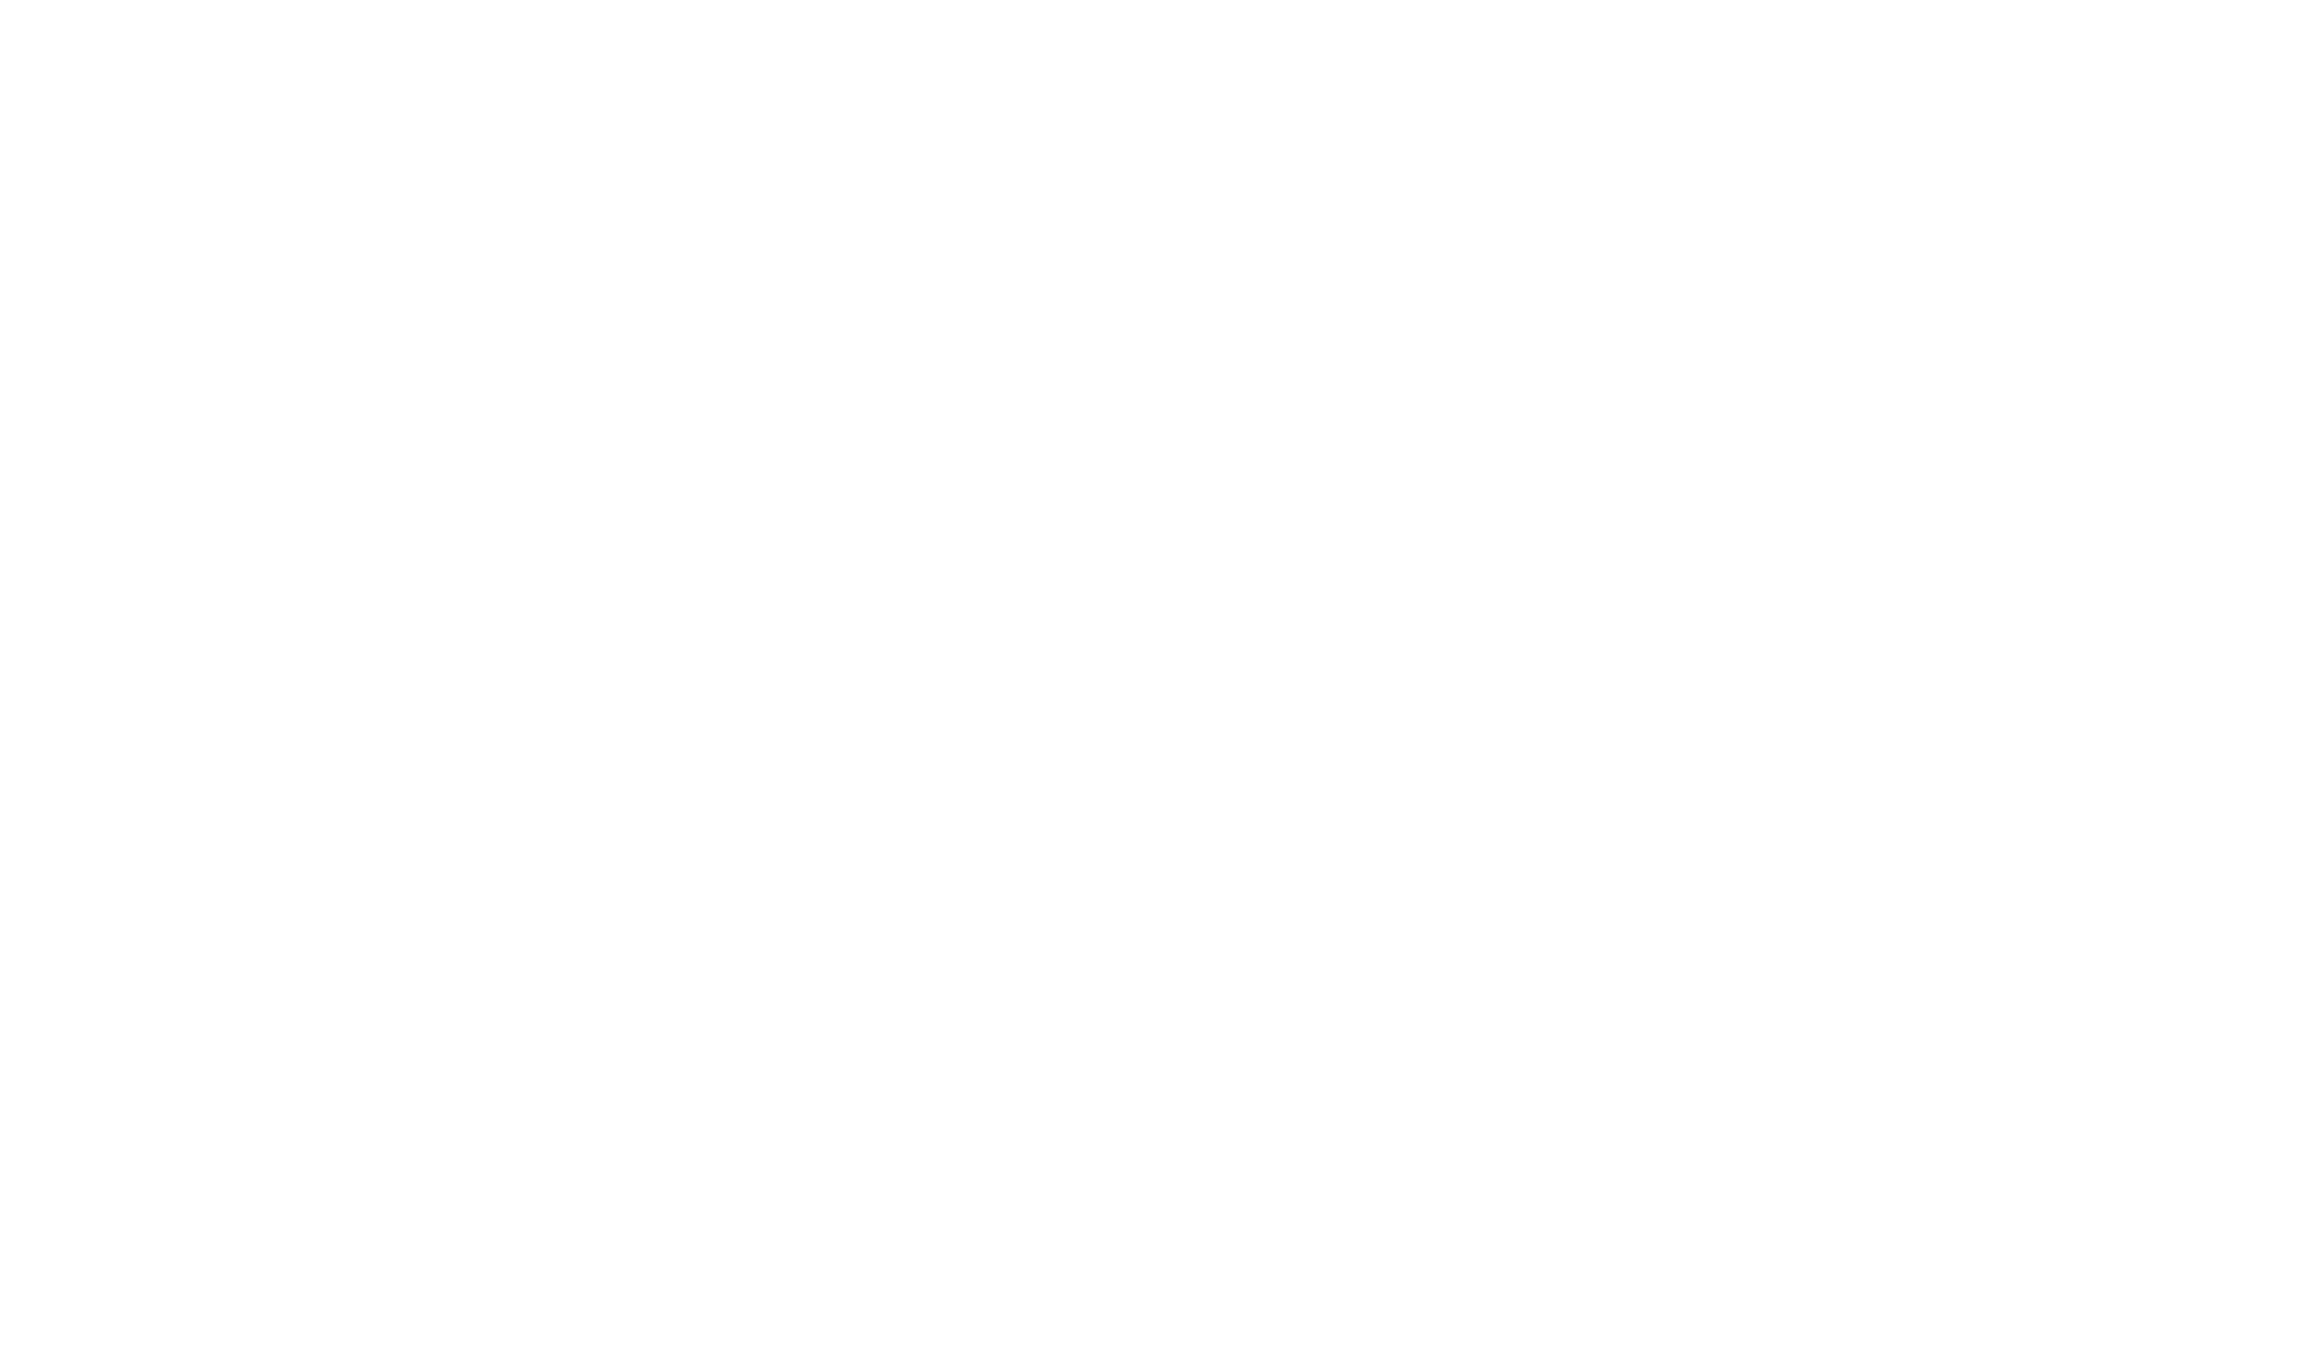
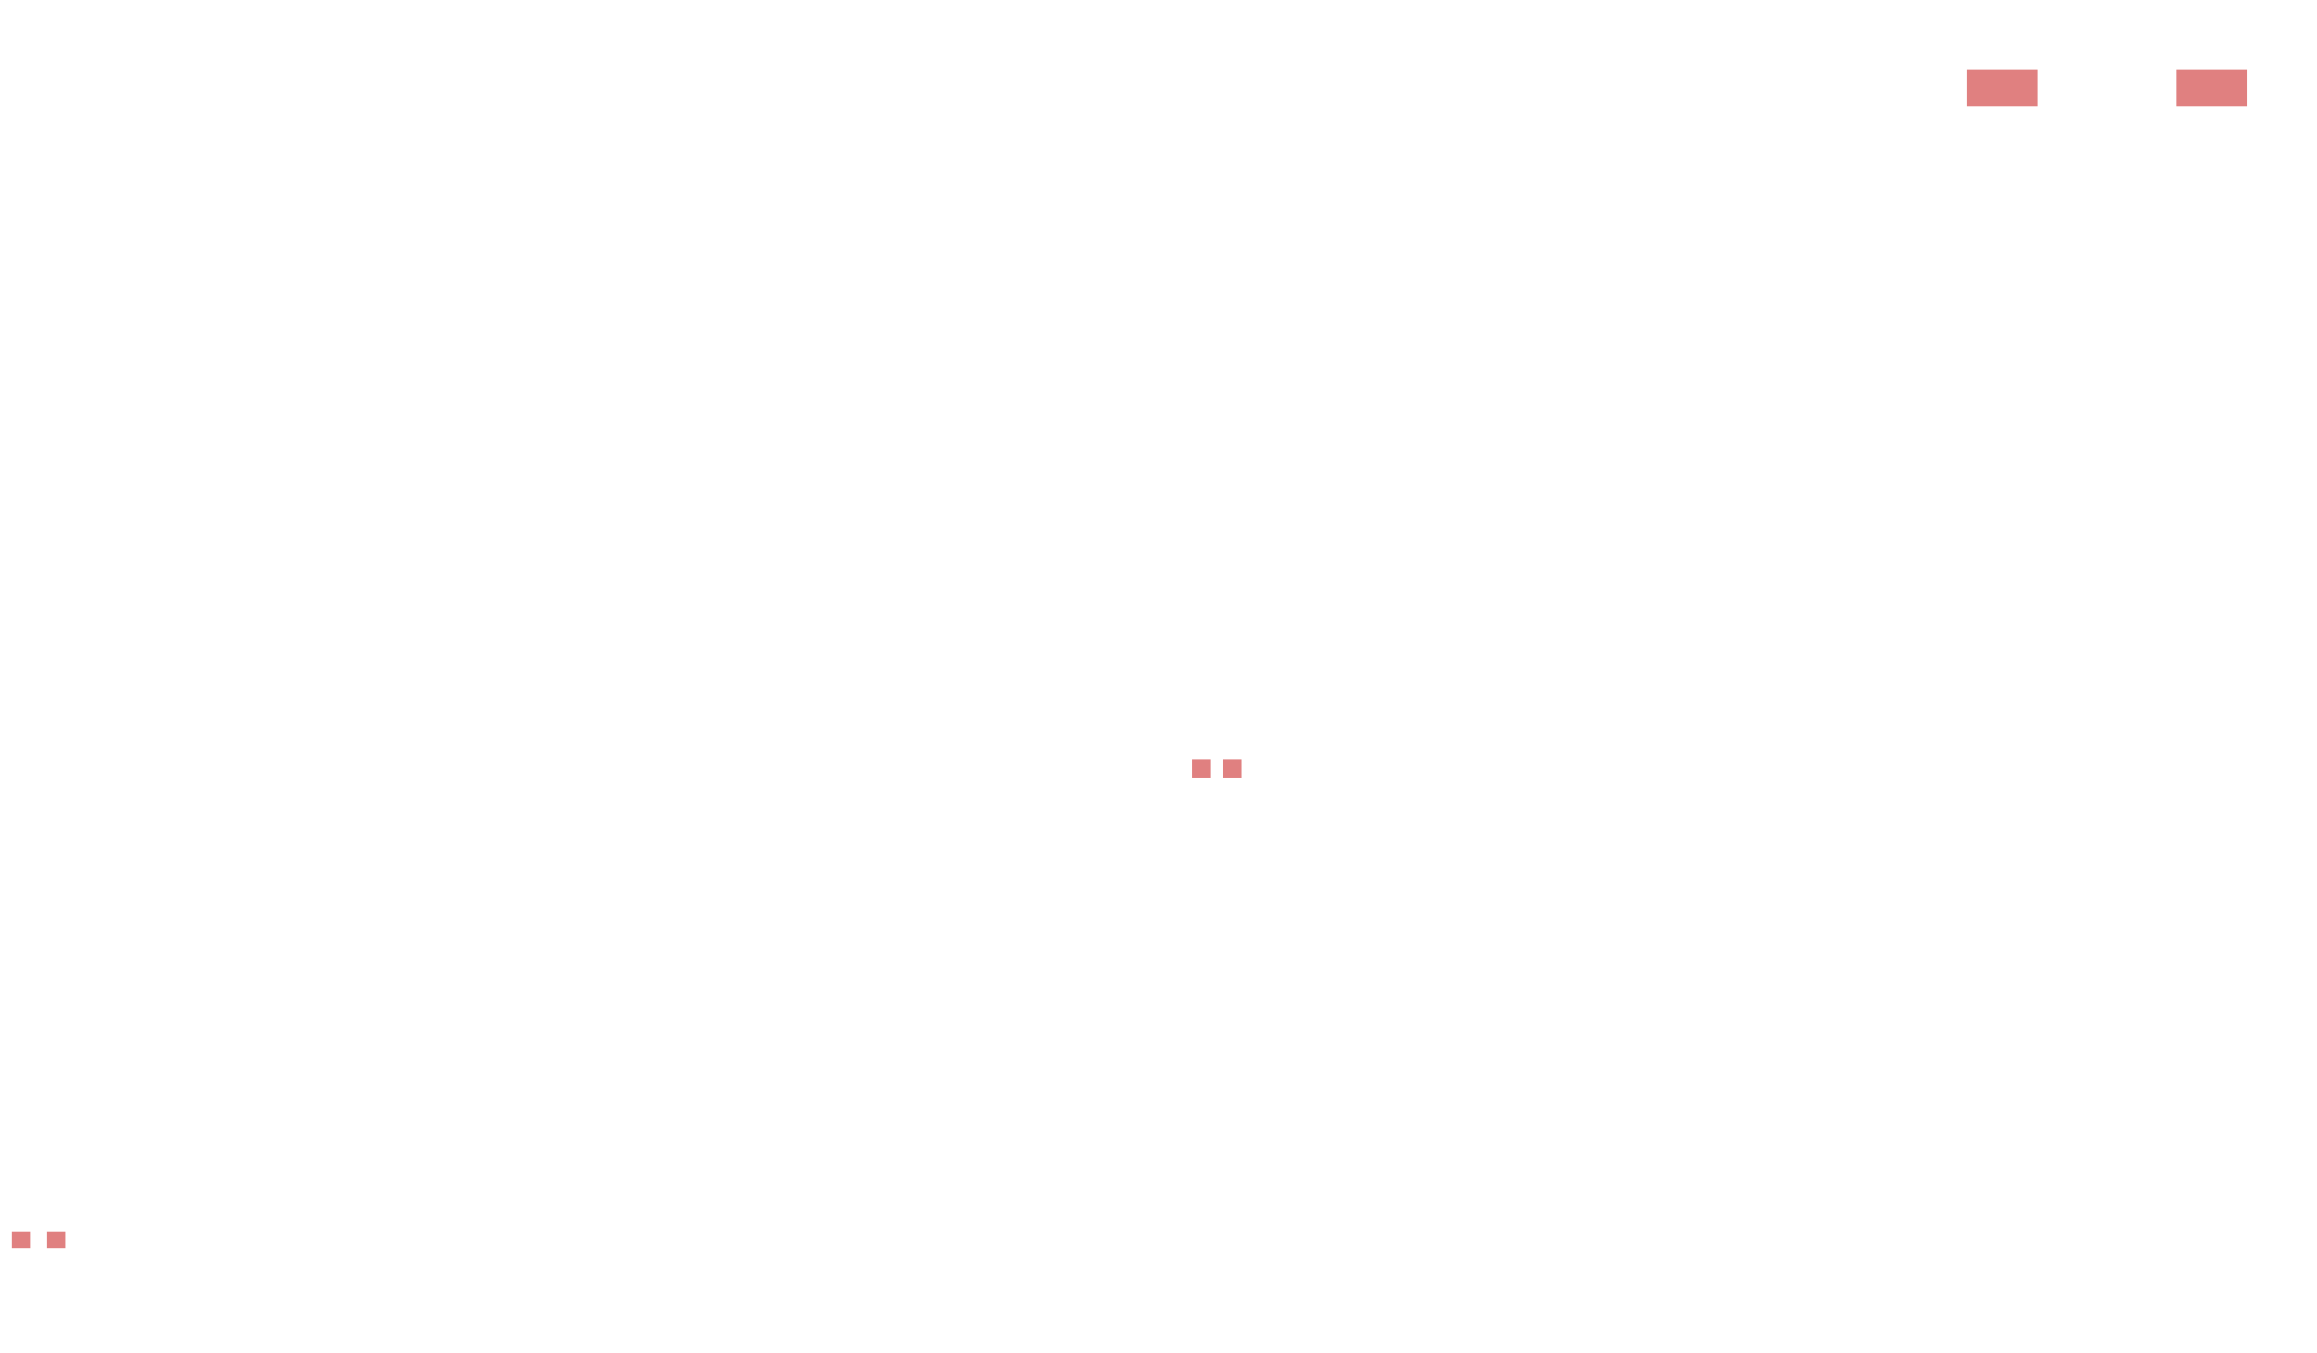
part: none -> (2002, 87)
part: none -> (2211, 87)
part: none -> (1216, 768)
part: none -> (38, 1239)

